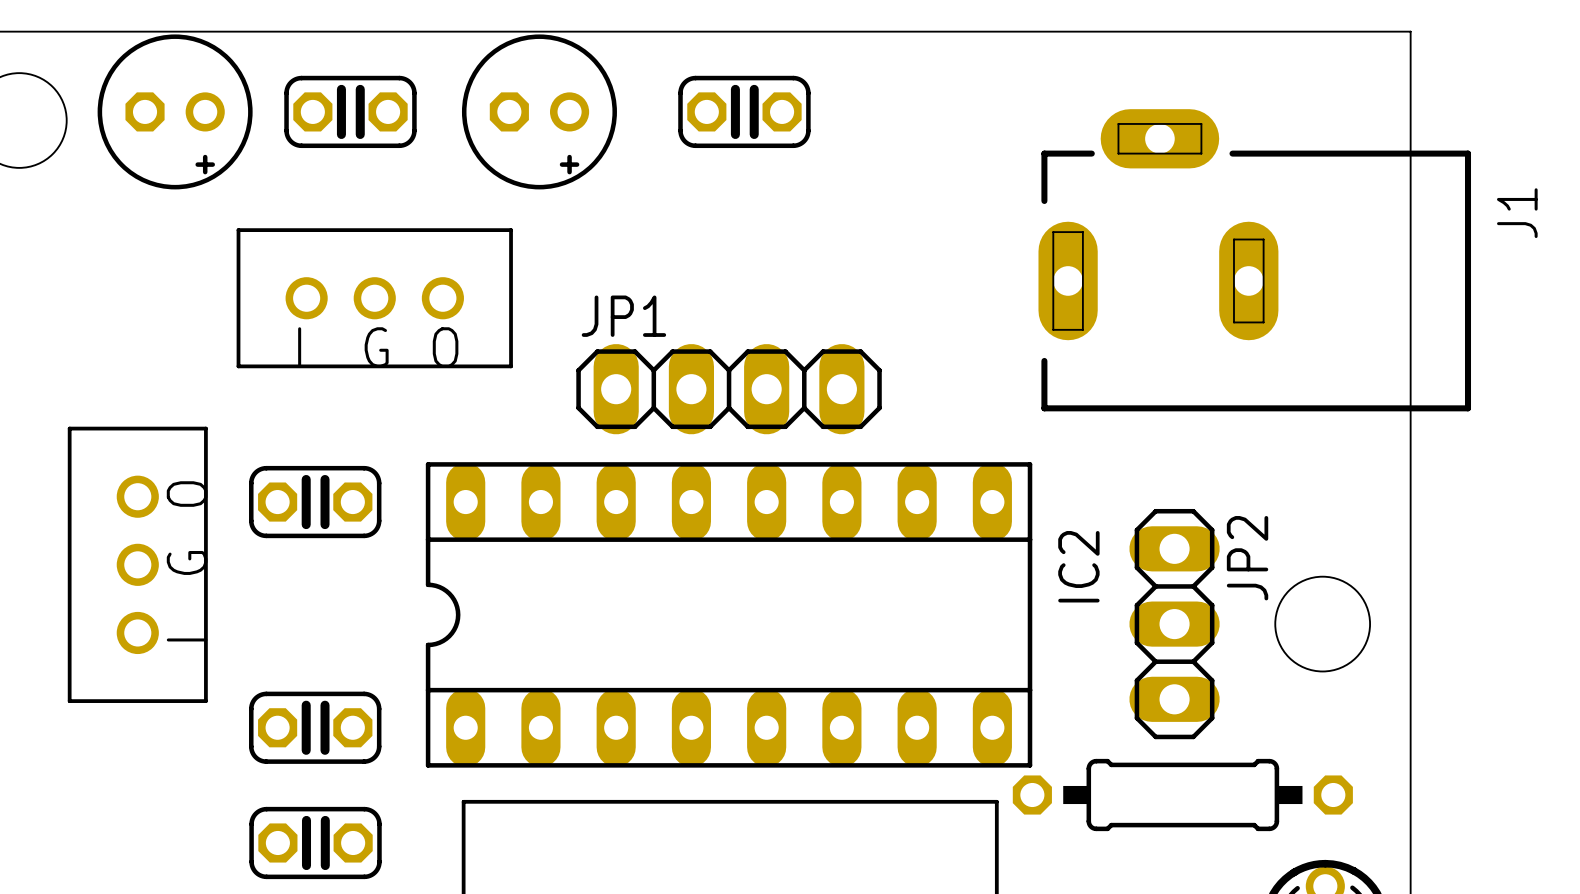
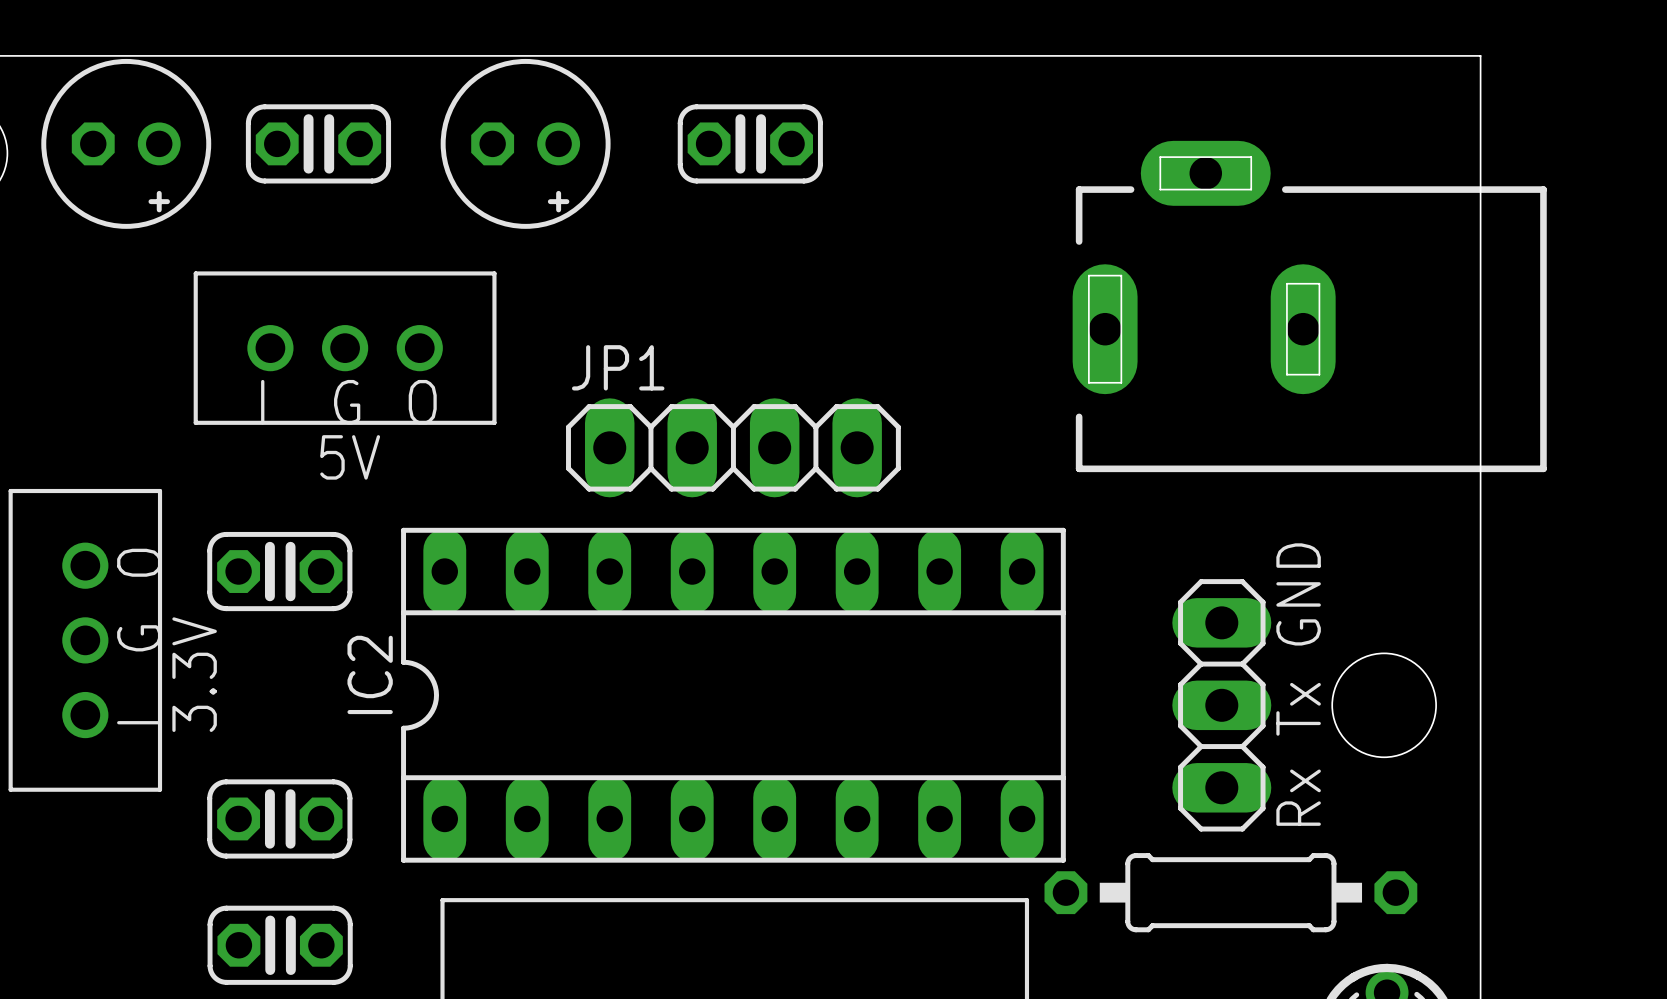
J1 name: J1 (1517, 213) -> none
text: none -> 5V (350, 457)
JP2 name: JP2 (1247, 558) -> none
IC2 name position: IC2 (1078, 566) -> IC2 (370, 674)
text: none -> 3.3V (194, 674)
text: none -> Rx Tx GND (1298, 684)

